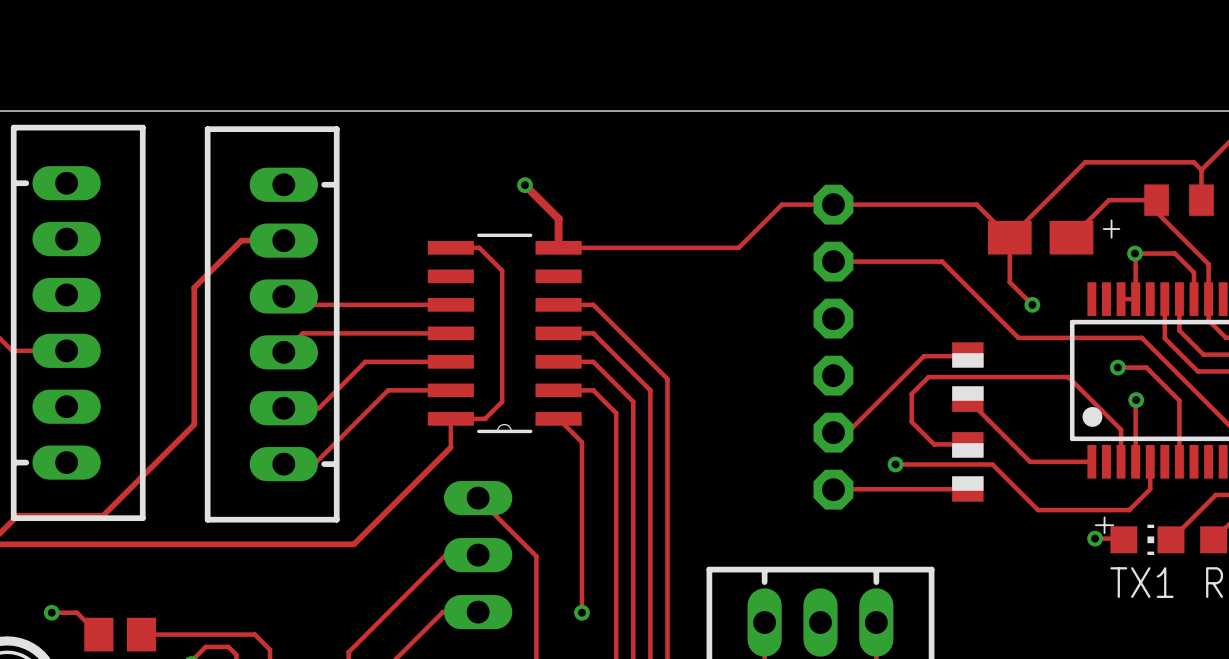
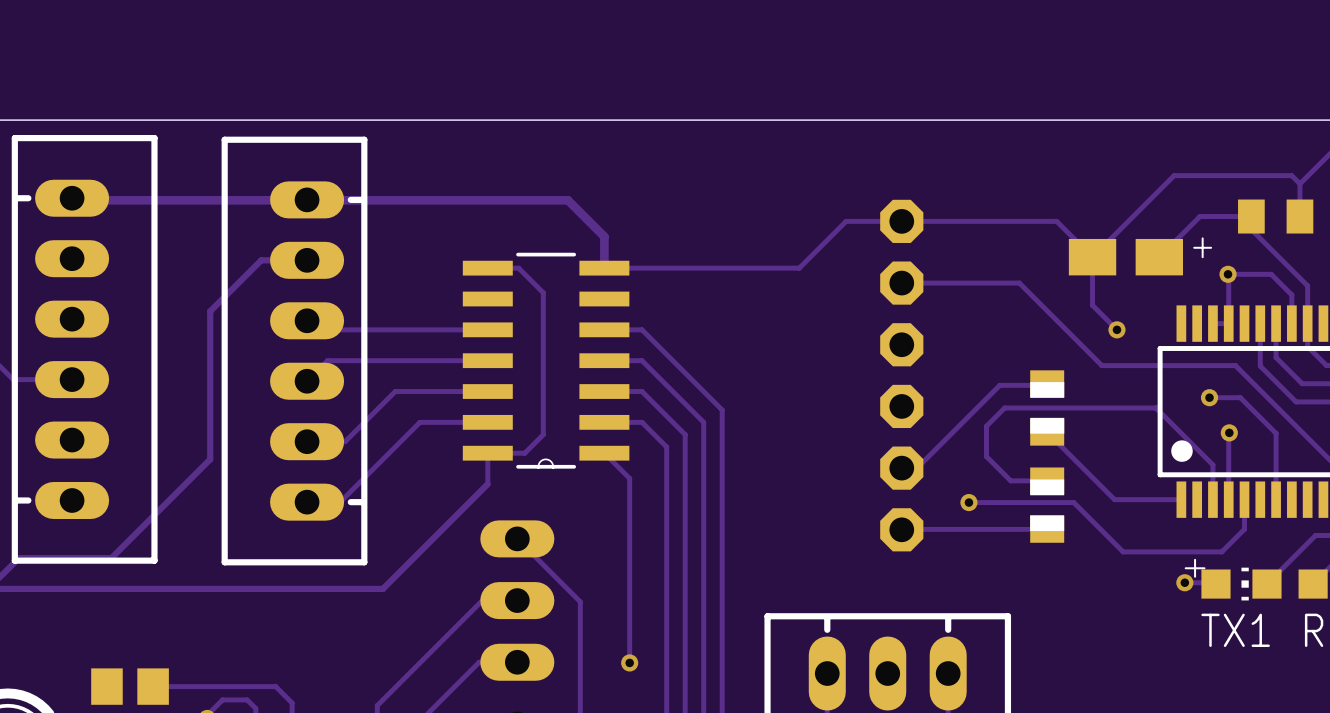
track: none -> (72, 198) (74, 200) (567, 200)
via: (524, 185) -> none
track: (51, 612) (77, 612) (98, 634) -> none
via: (51, 612) -> none

